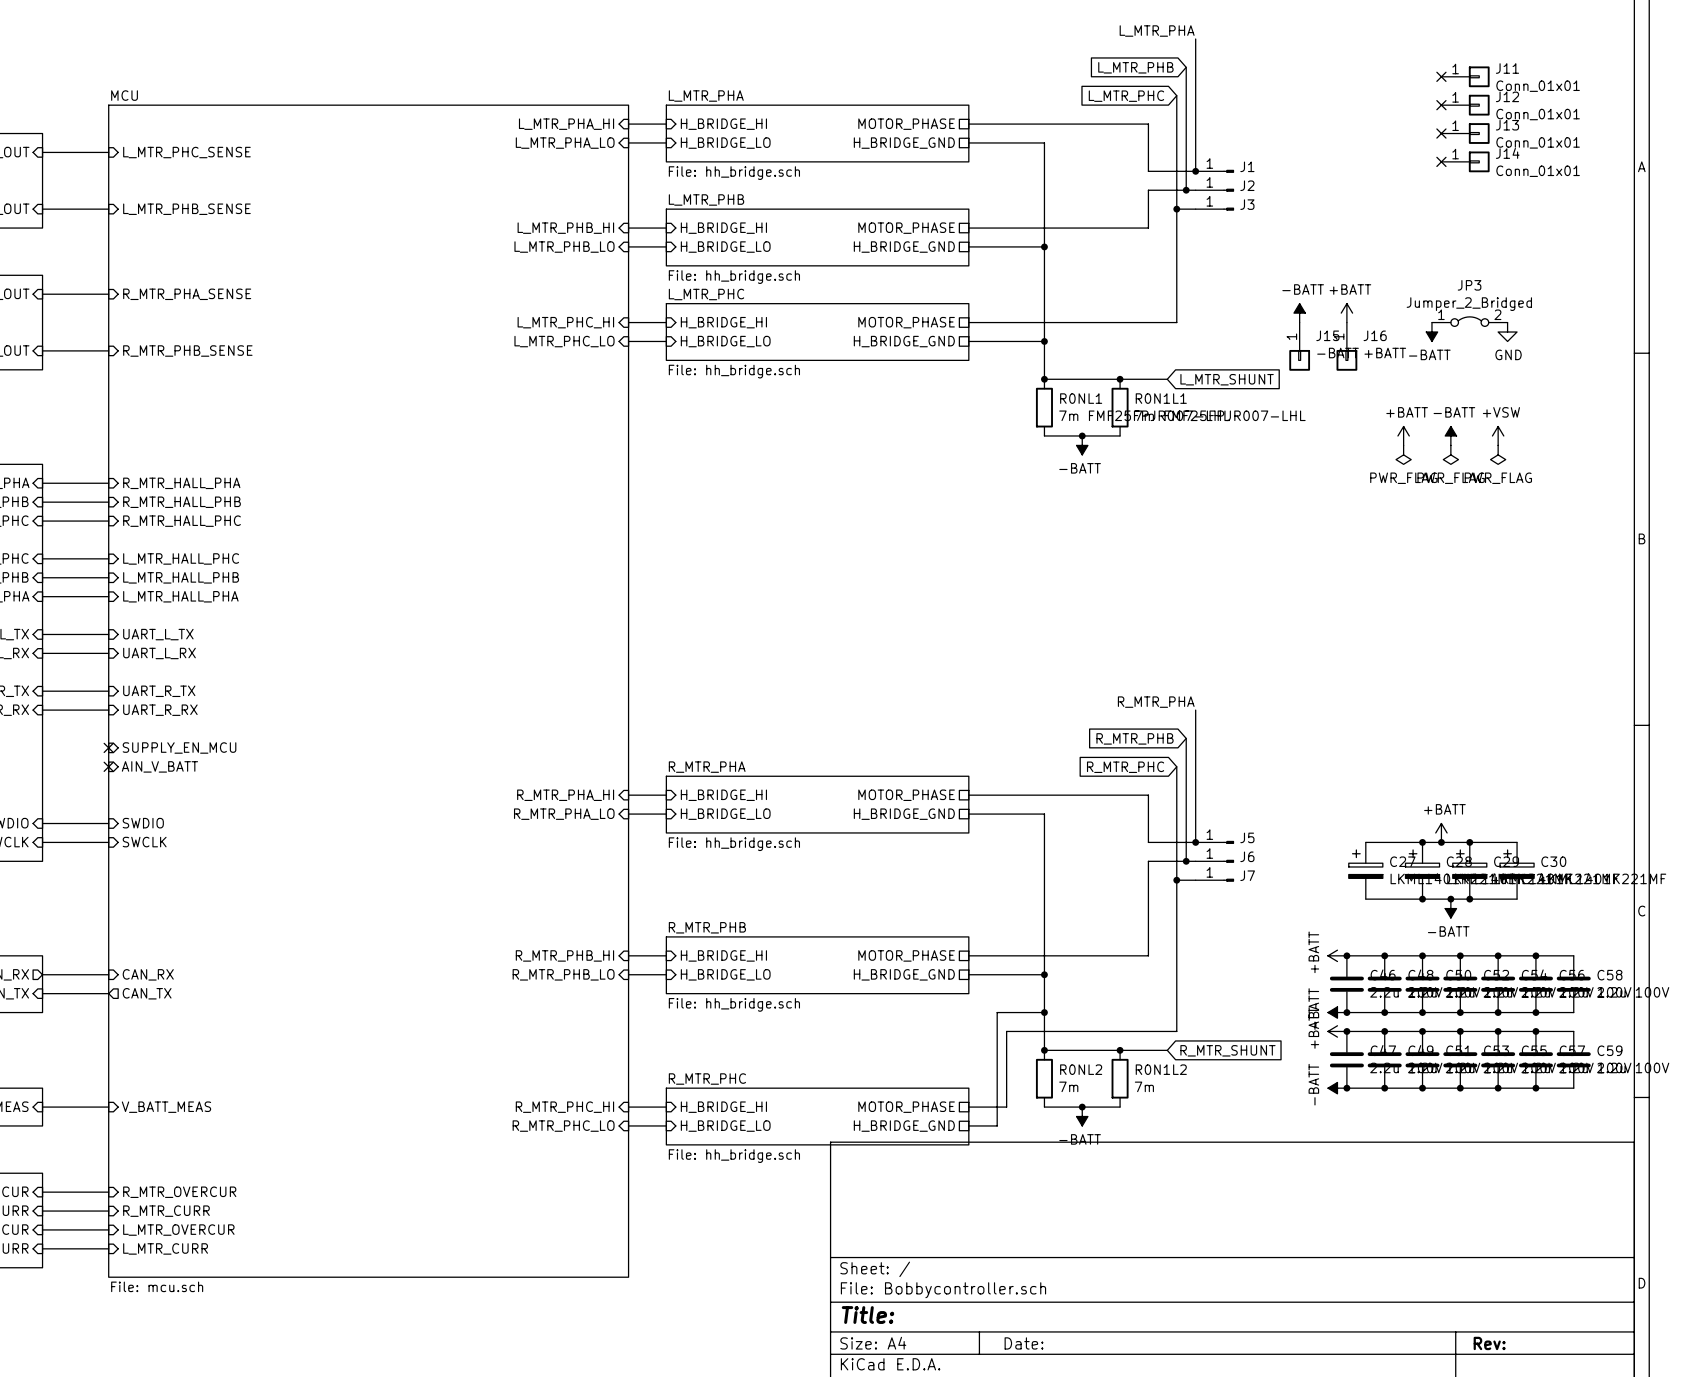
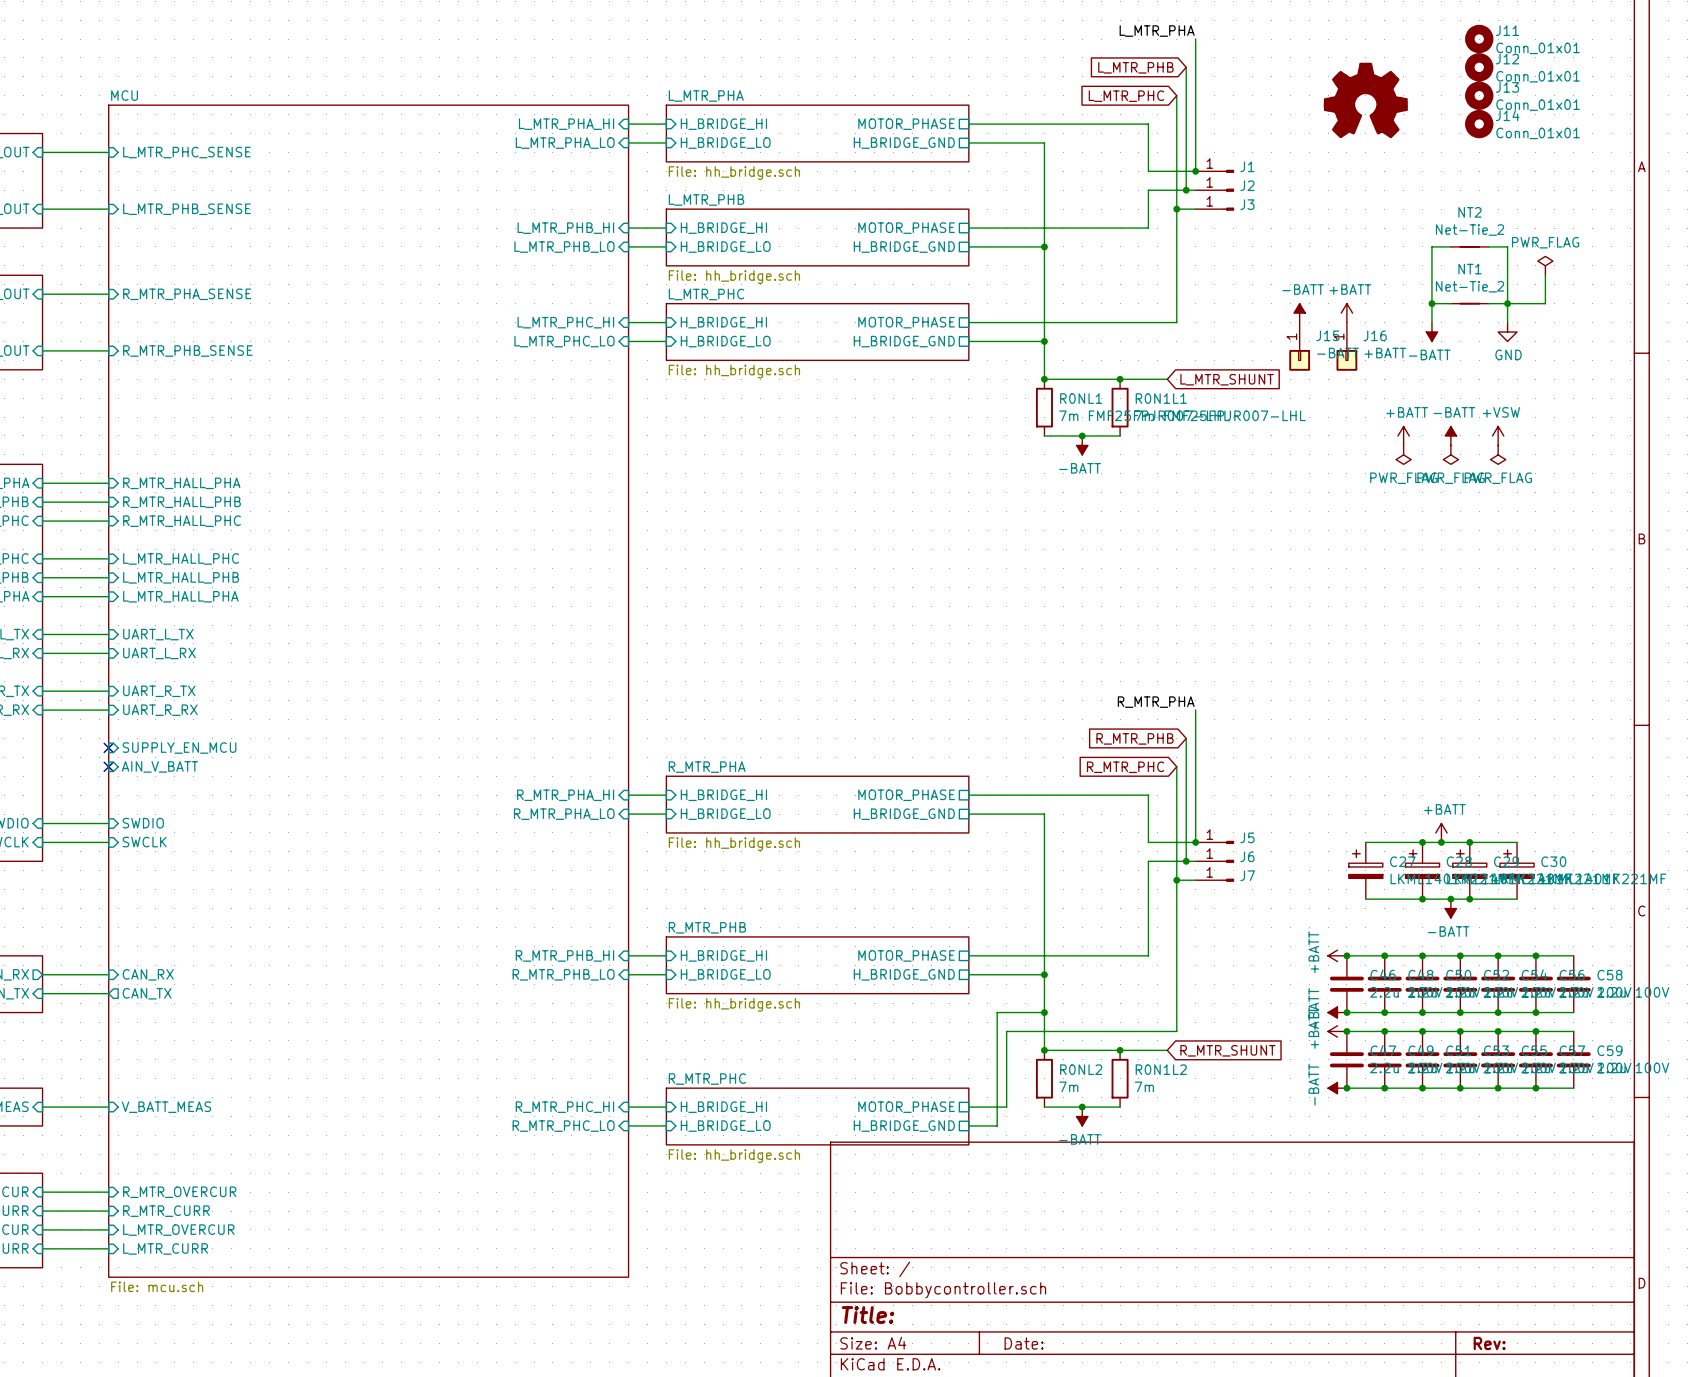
J11 symbol: [1441, 66, 1490, 88] -> [1465, 24, 1494, 54]
no-connect mark: (1441, 76) -> none
J12 symbol: [1441, 94, 1490, 116] -> [1465, 53, 1494, 82]
part: none -> (1365, 100)
no-connect mark: (1441, 105) -> none
J13 symbol: [1441, 123, 1490, 144] -> [1465, 81, 1494, 110]
no-connect mark: (1441, 133) -> none
J14 symbol: [1441, 151, 1490, 173] -> [1465, 109, 1494, 139]
no-connect mark: (1441, 161) -> none
wire: none -> (1450, 246) (1431, 246) (1431, 322)
NT2: none -> Net-Tie_2 (1469, 246)
wire: none -> (1488, 246) (1507, 246) (1507, 322)
power symbol: none -> PWR_FLAG (1545, 265)
wire: none -> (1545, 275) (1545, 303) (1488, 303)
wire: none -> (1431, 303) (1450, 303)
junction: none -> (1431, 303)
NT1: none -> Net-Tie_2 (1469, 303)
junction: none -> (1507, 303)
JP3: Jumper_2_Bridged (1469, 321) -> none

